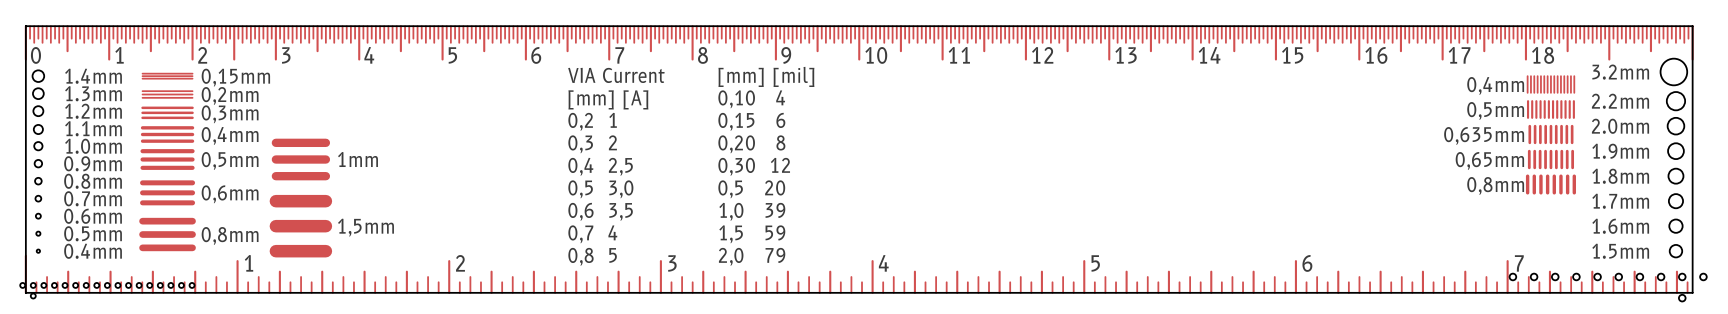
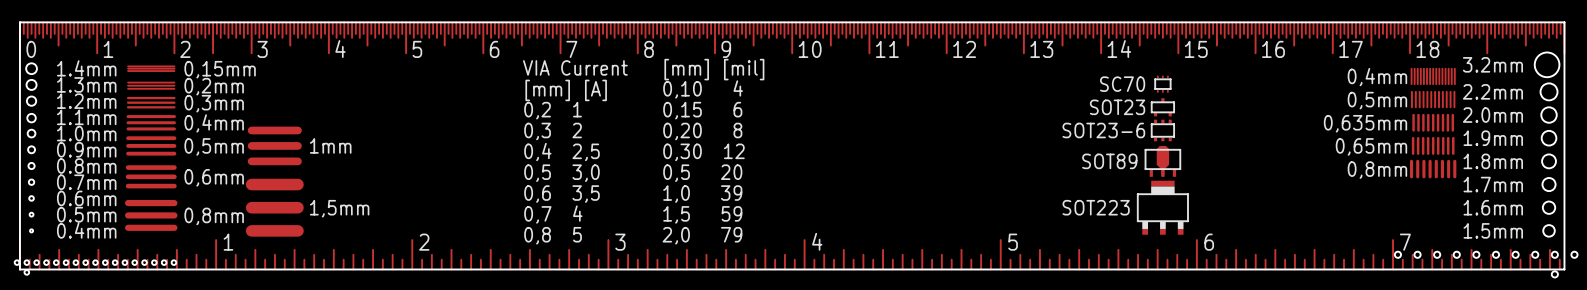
text: none -> SC70 (1122, 84)
part: none -> (1162, 84)
text: none -> SOT23 (1117, 107)
part: none -> (1162, 107)
text: none -> SOT23-6 (1103, 130)
part: none -> (1162, 130)
text: none -> SOT89 (1109, 161)
part: none -> (1162, 161)
text: none -> SOT223 (1096, 207)
part: none -> (1162, 207)

